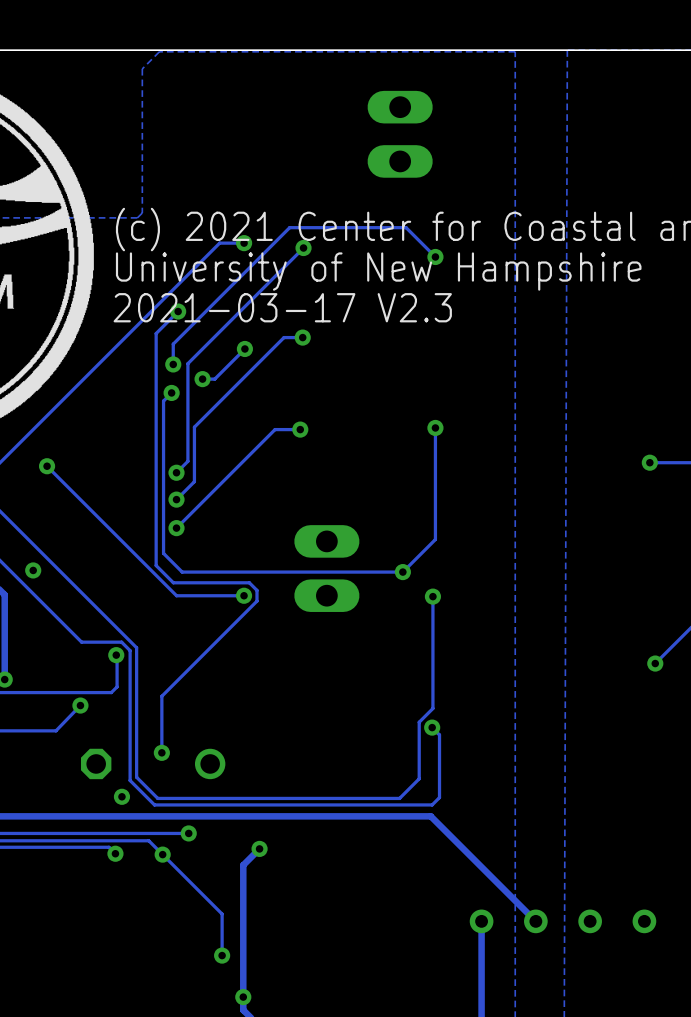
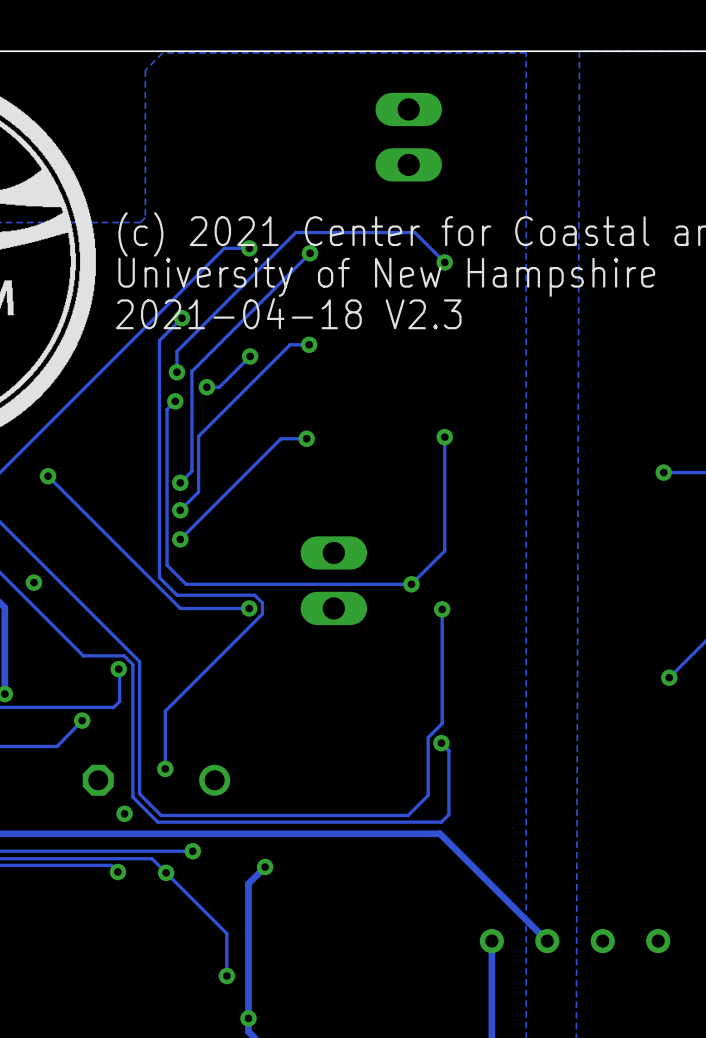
text: 2021-03-17 V2.3 (282, 307) -> 2021-04-18 V2.3 (288, 313)

